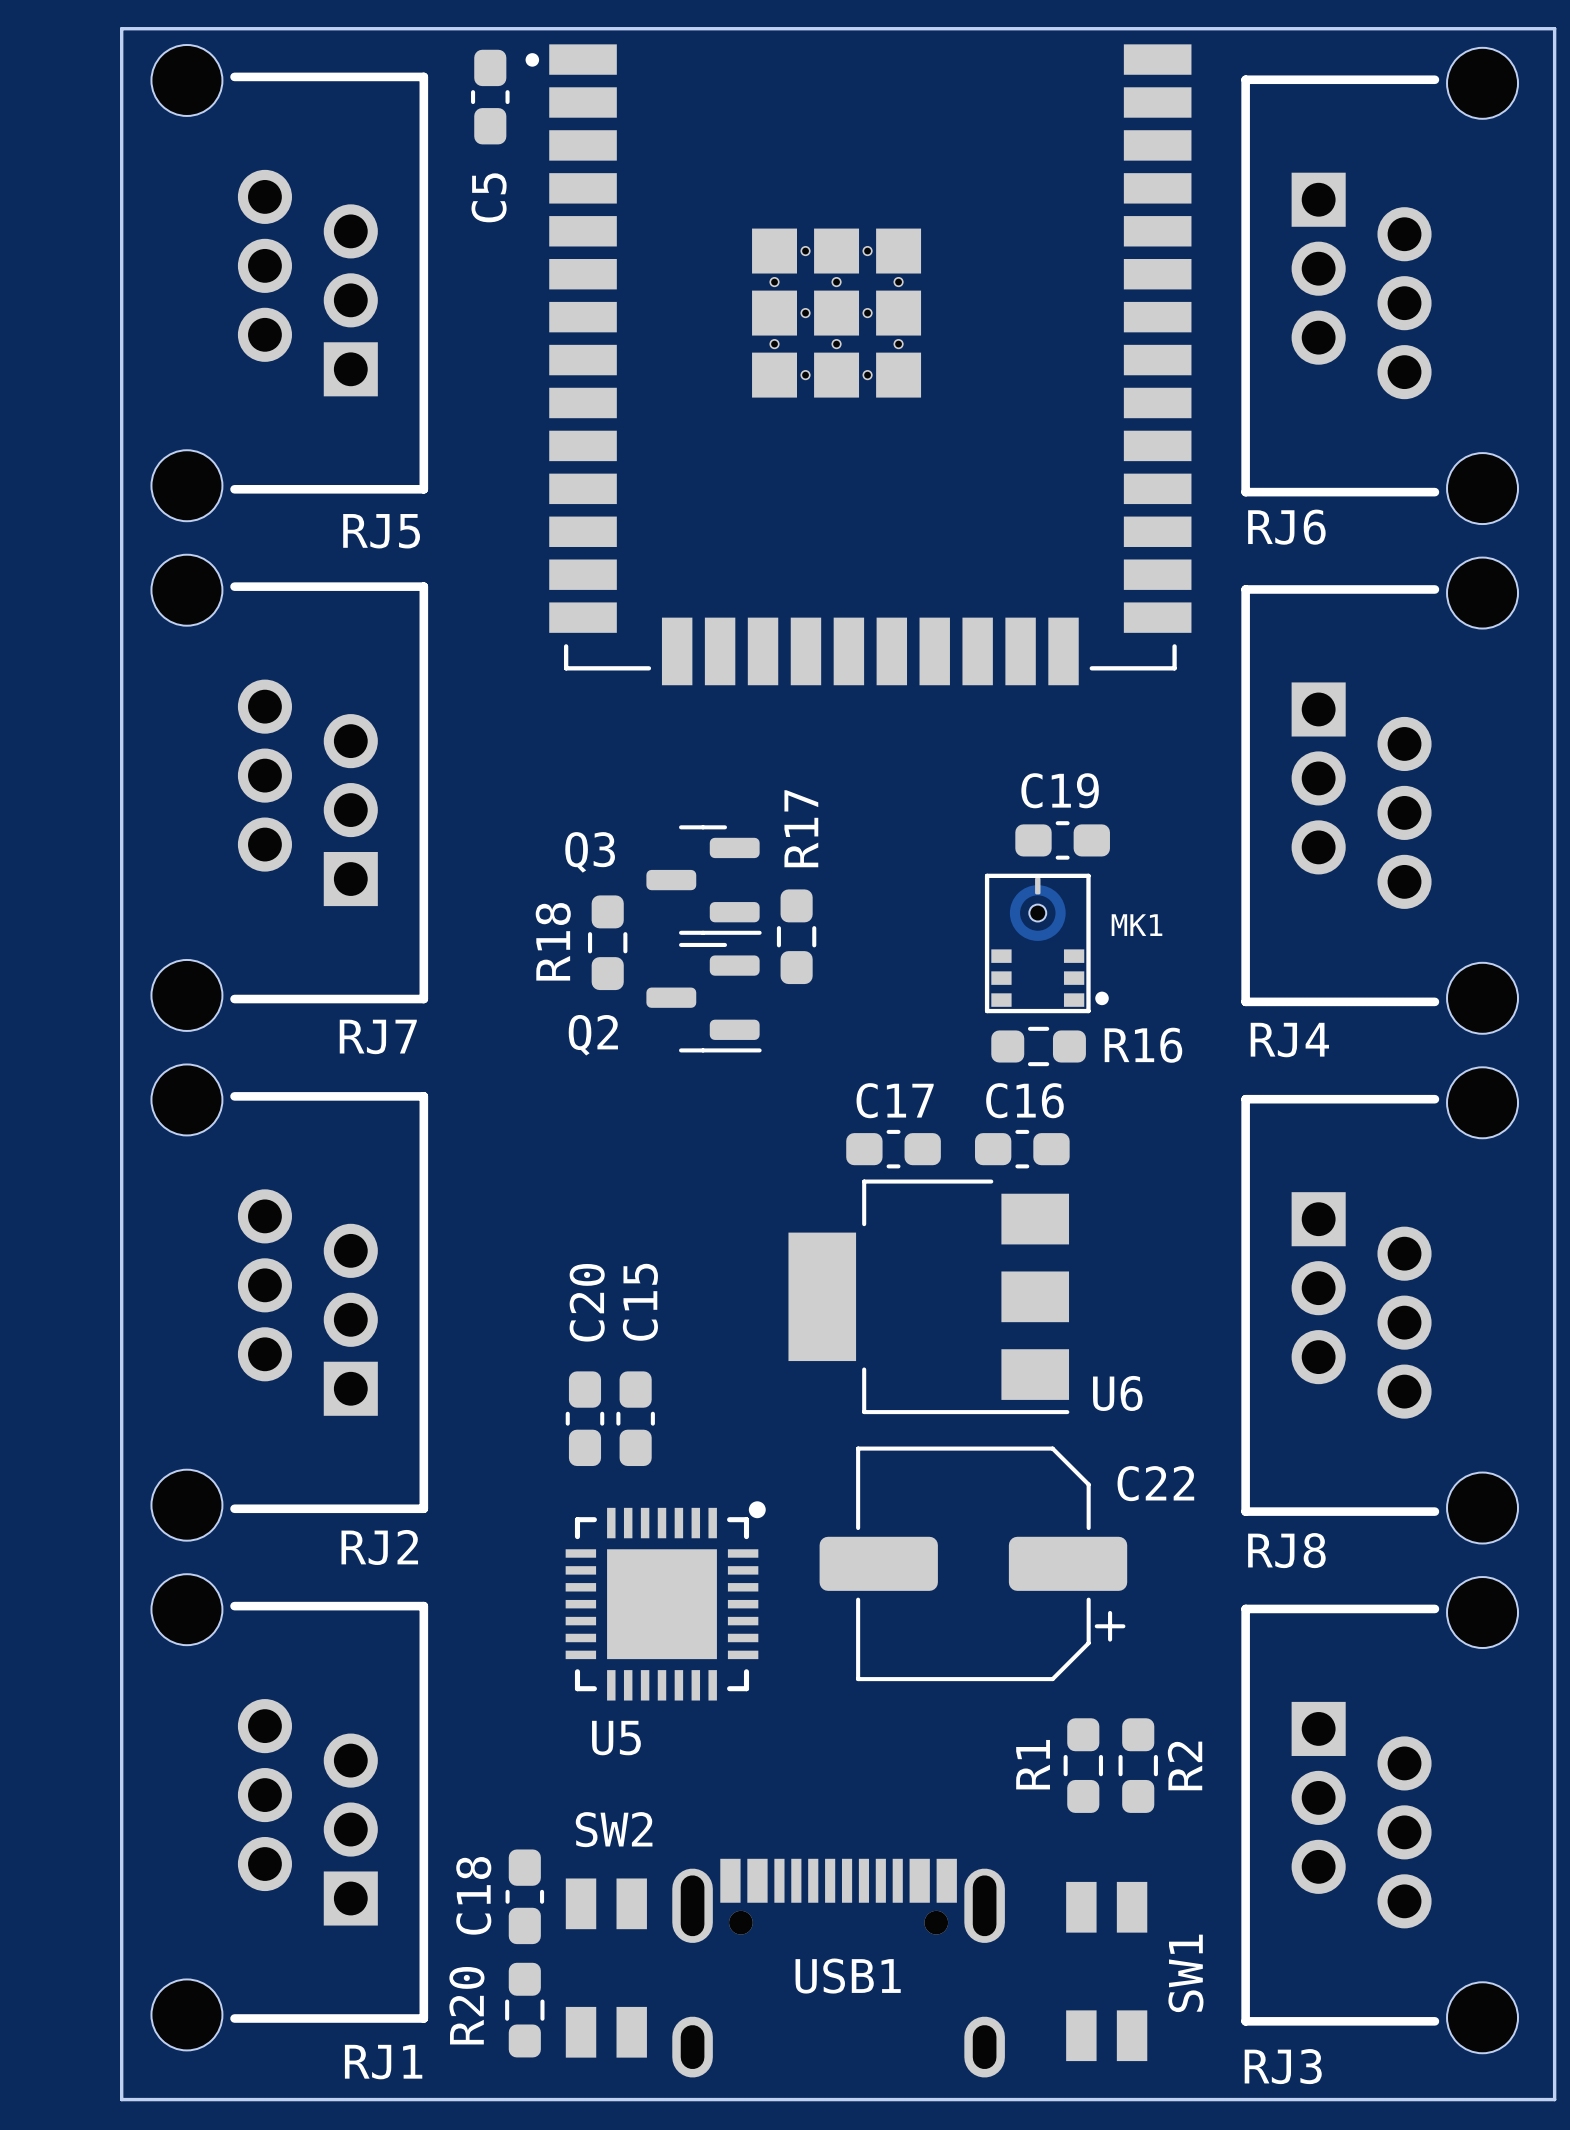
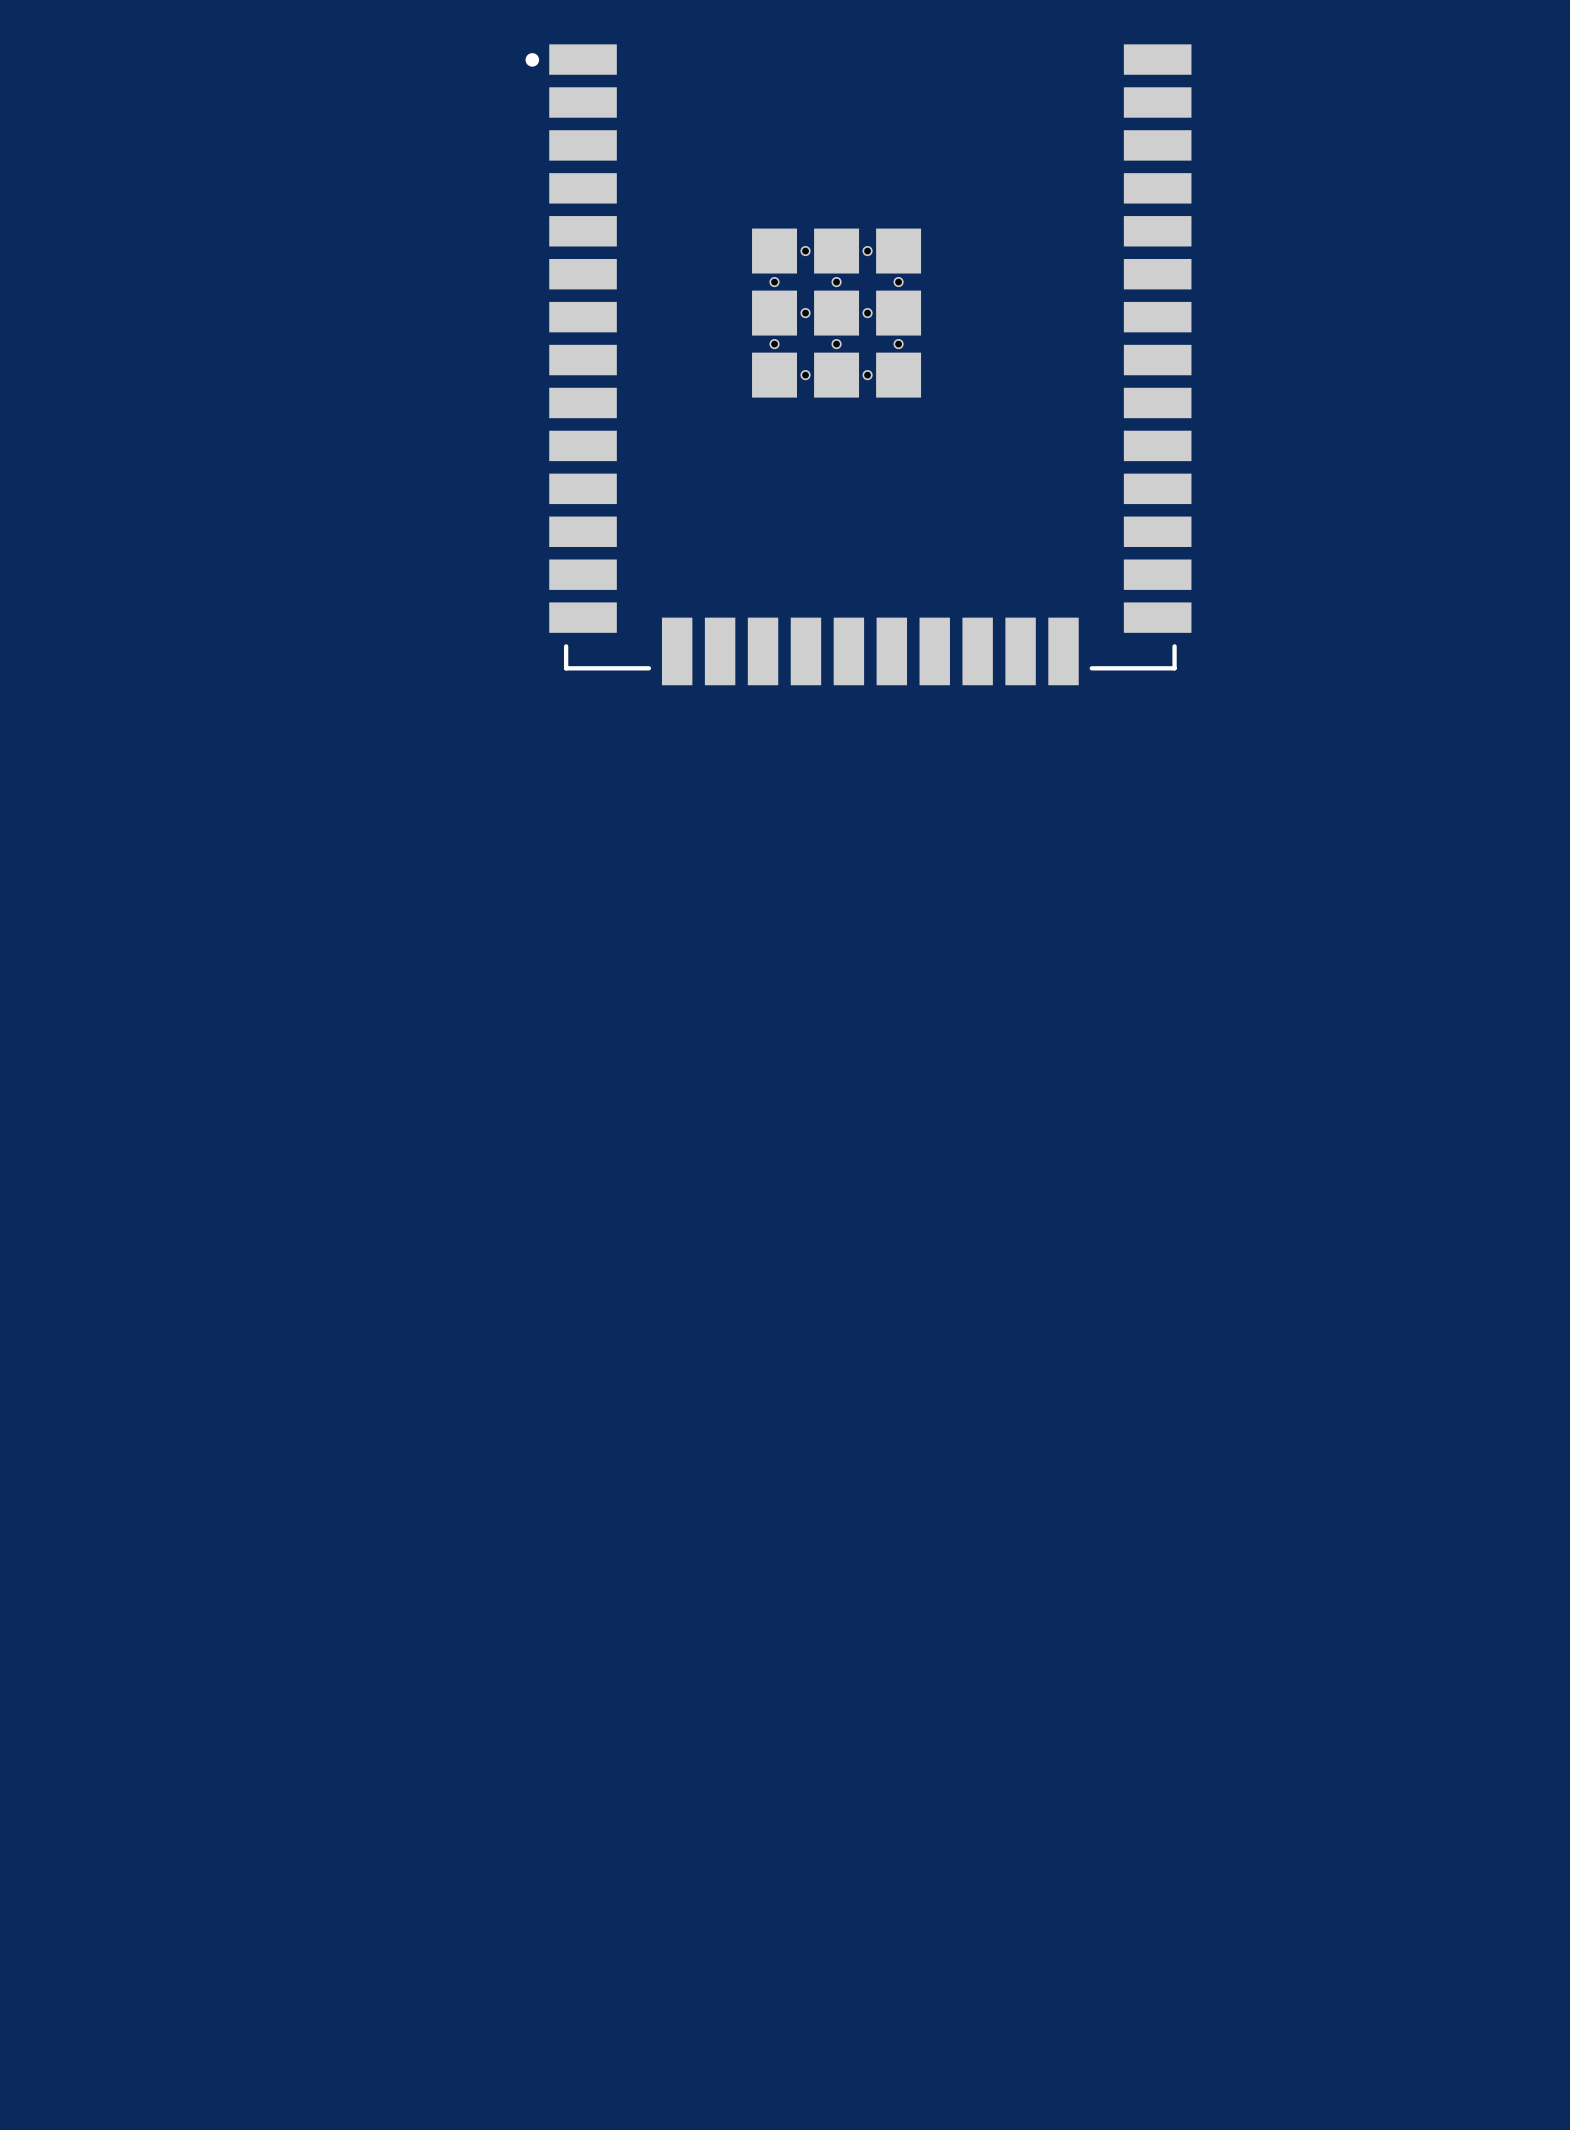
board edge: (121, 28) (1554, 28) (1554, 2099) (121, 2099) (121, 28) -> none
C5: (490, 97) -> none
RJ5: (289, 283) -> none
RJ6: (1379, 285) -> none
RJ7: (289, 792) -> none
RJ4: (1379, 795) -> none
C19: (1062, 840) -> none
Q3: (704, 880) -> none
R17: (796, 936) -> none
R18: (607, 942) -> none
MK1: (1046, 943) -> none
Q2: (704, 997) -> none
R16: (1038, 1046) -> none
C17: (893, 1149) -> none
C16: (1022, 1149) -> none
U6: (928, 1296) -> none
RJ2: (289, 1302) -> none
RJ8: (1379, 1305) -> none
C20: (584, 1418) -> none
C15: (635, 1418) -> none
C22: (973, 1563) -> none
U5: (665, 1600) -> none
R1: (1083, 1765) -> none
R2: (1138, 1765) -> none
RJ1: (289, 1812) -> none
RJ3: (1379, 1815) -> none
C18: (524, 1896) -> none
SW2: (606, 1968) -> none
USB1: (838, 1968) -> none
SW1: (1106, 1971) -> none
R20: (524, 2010) -> none

